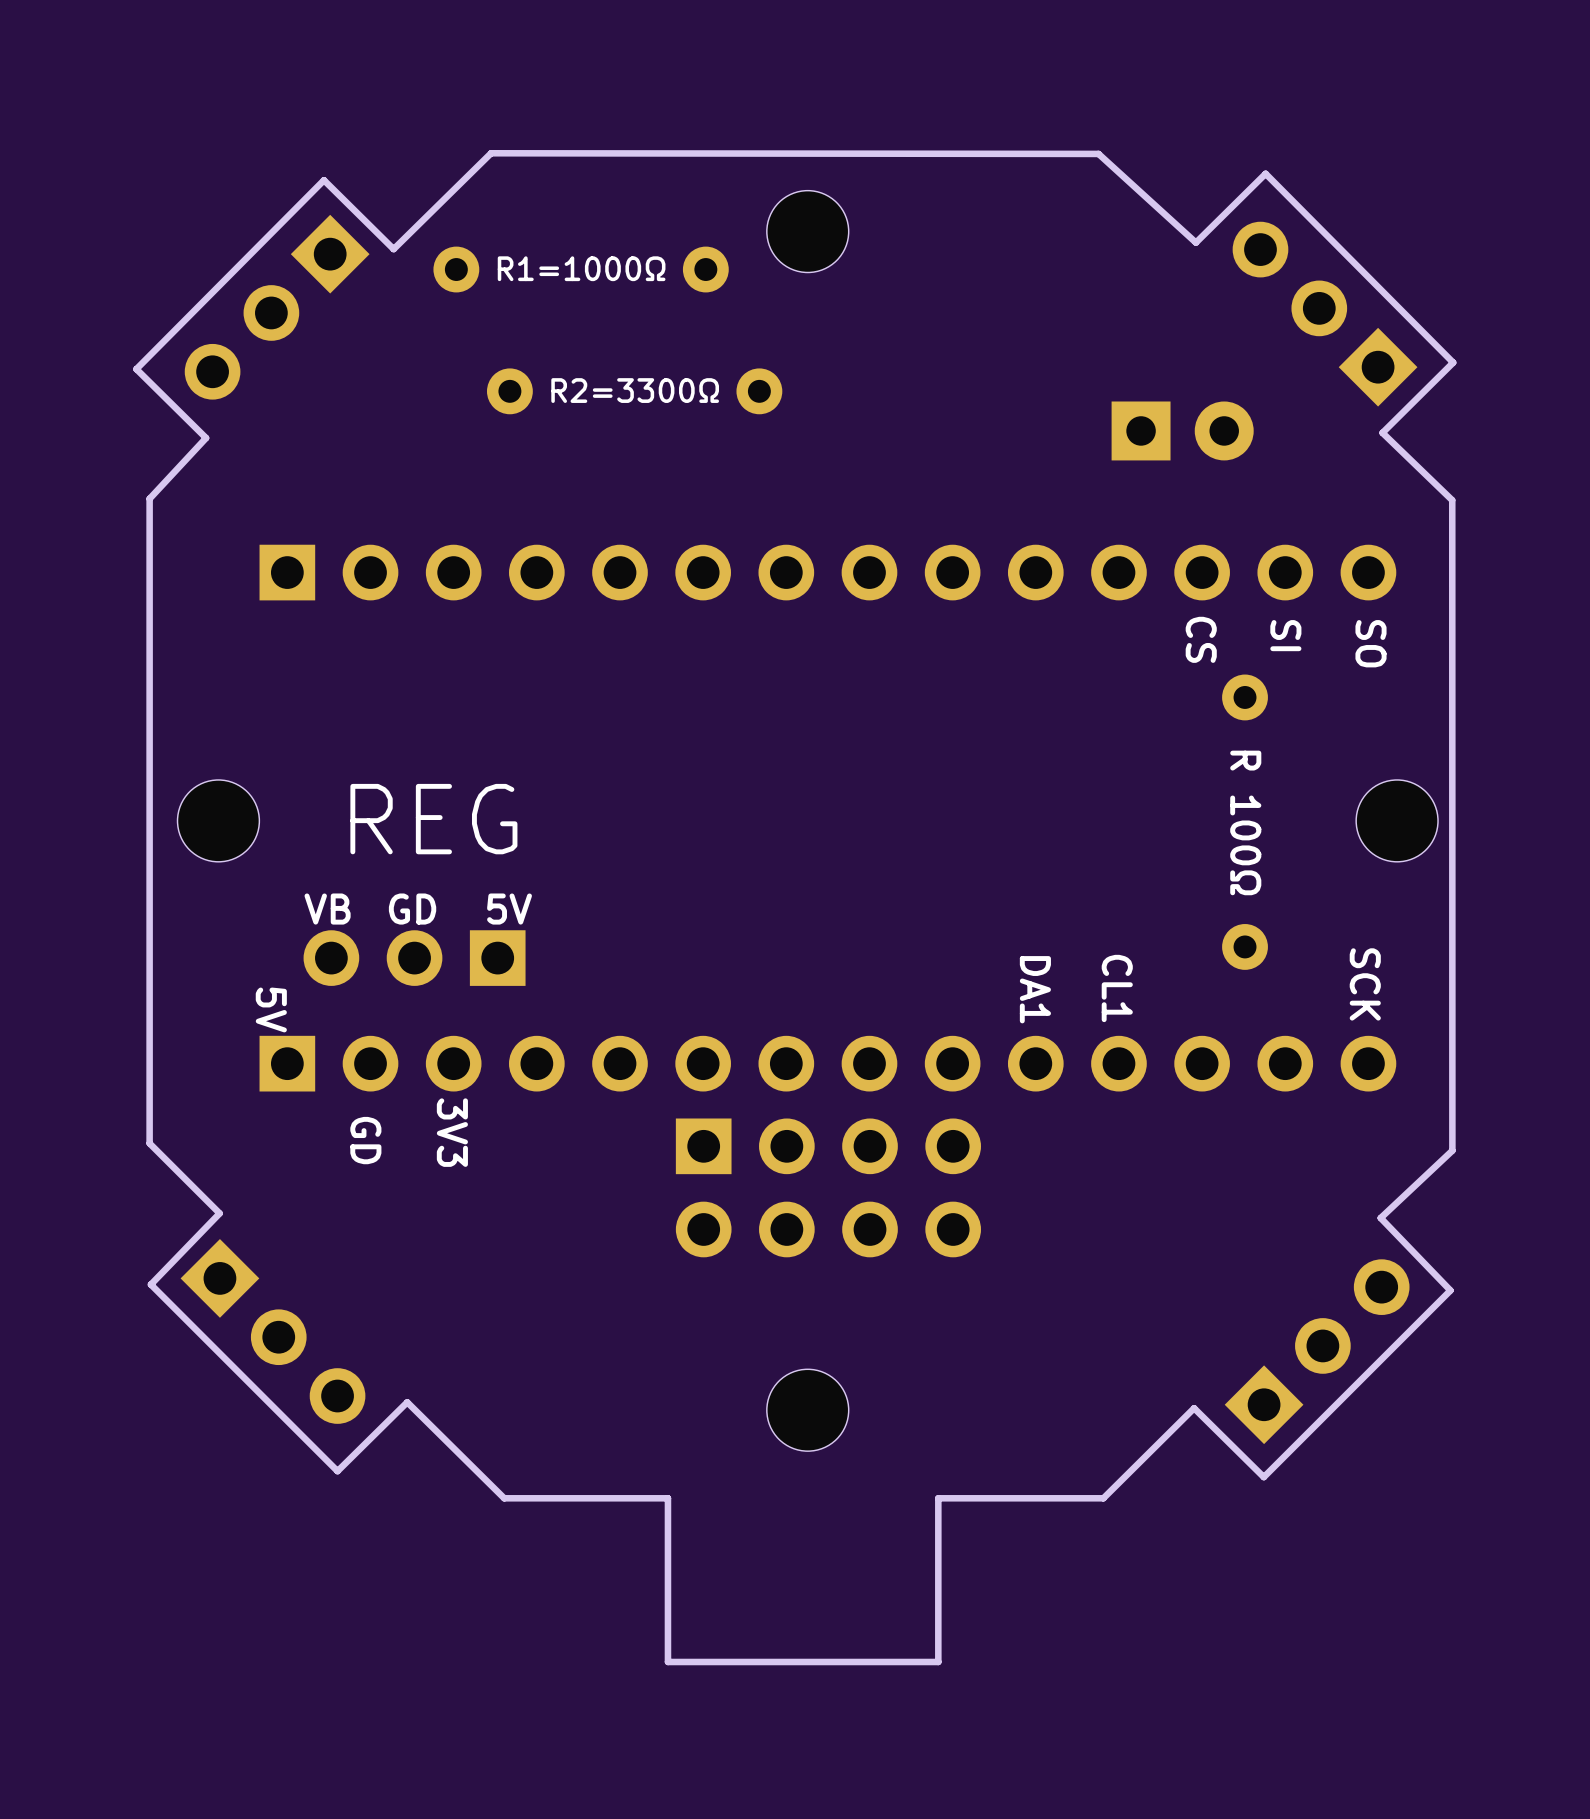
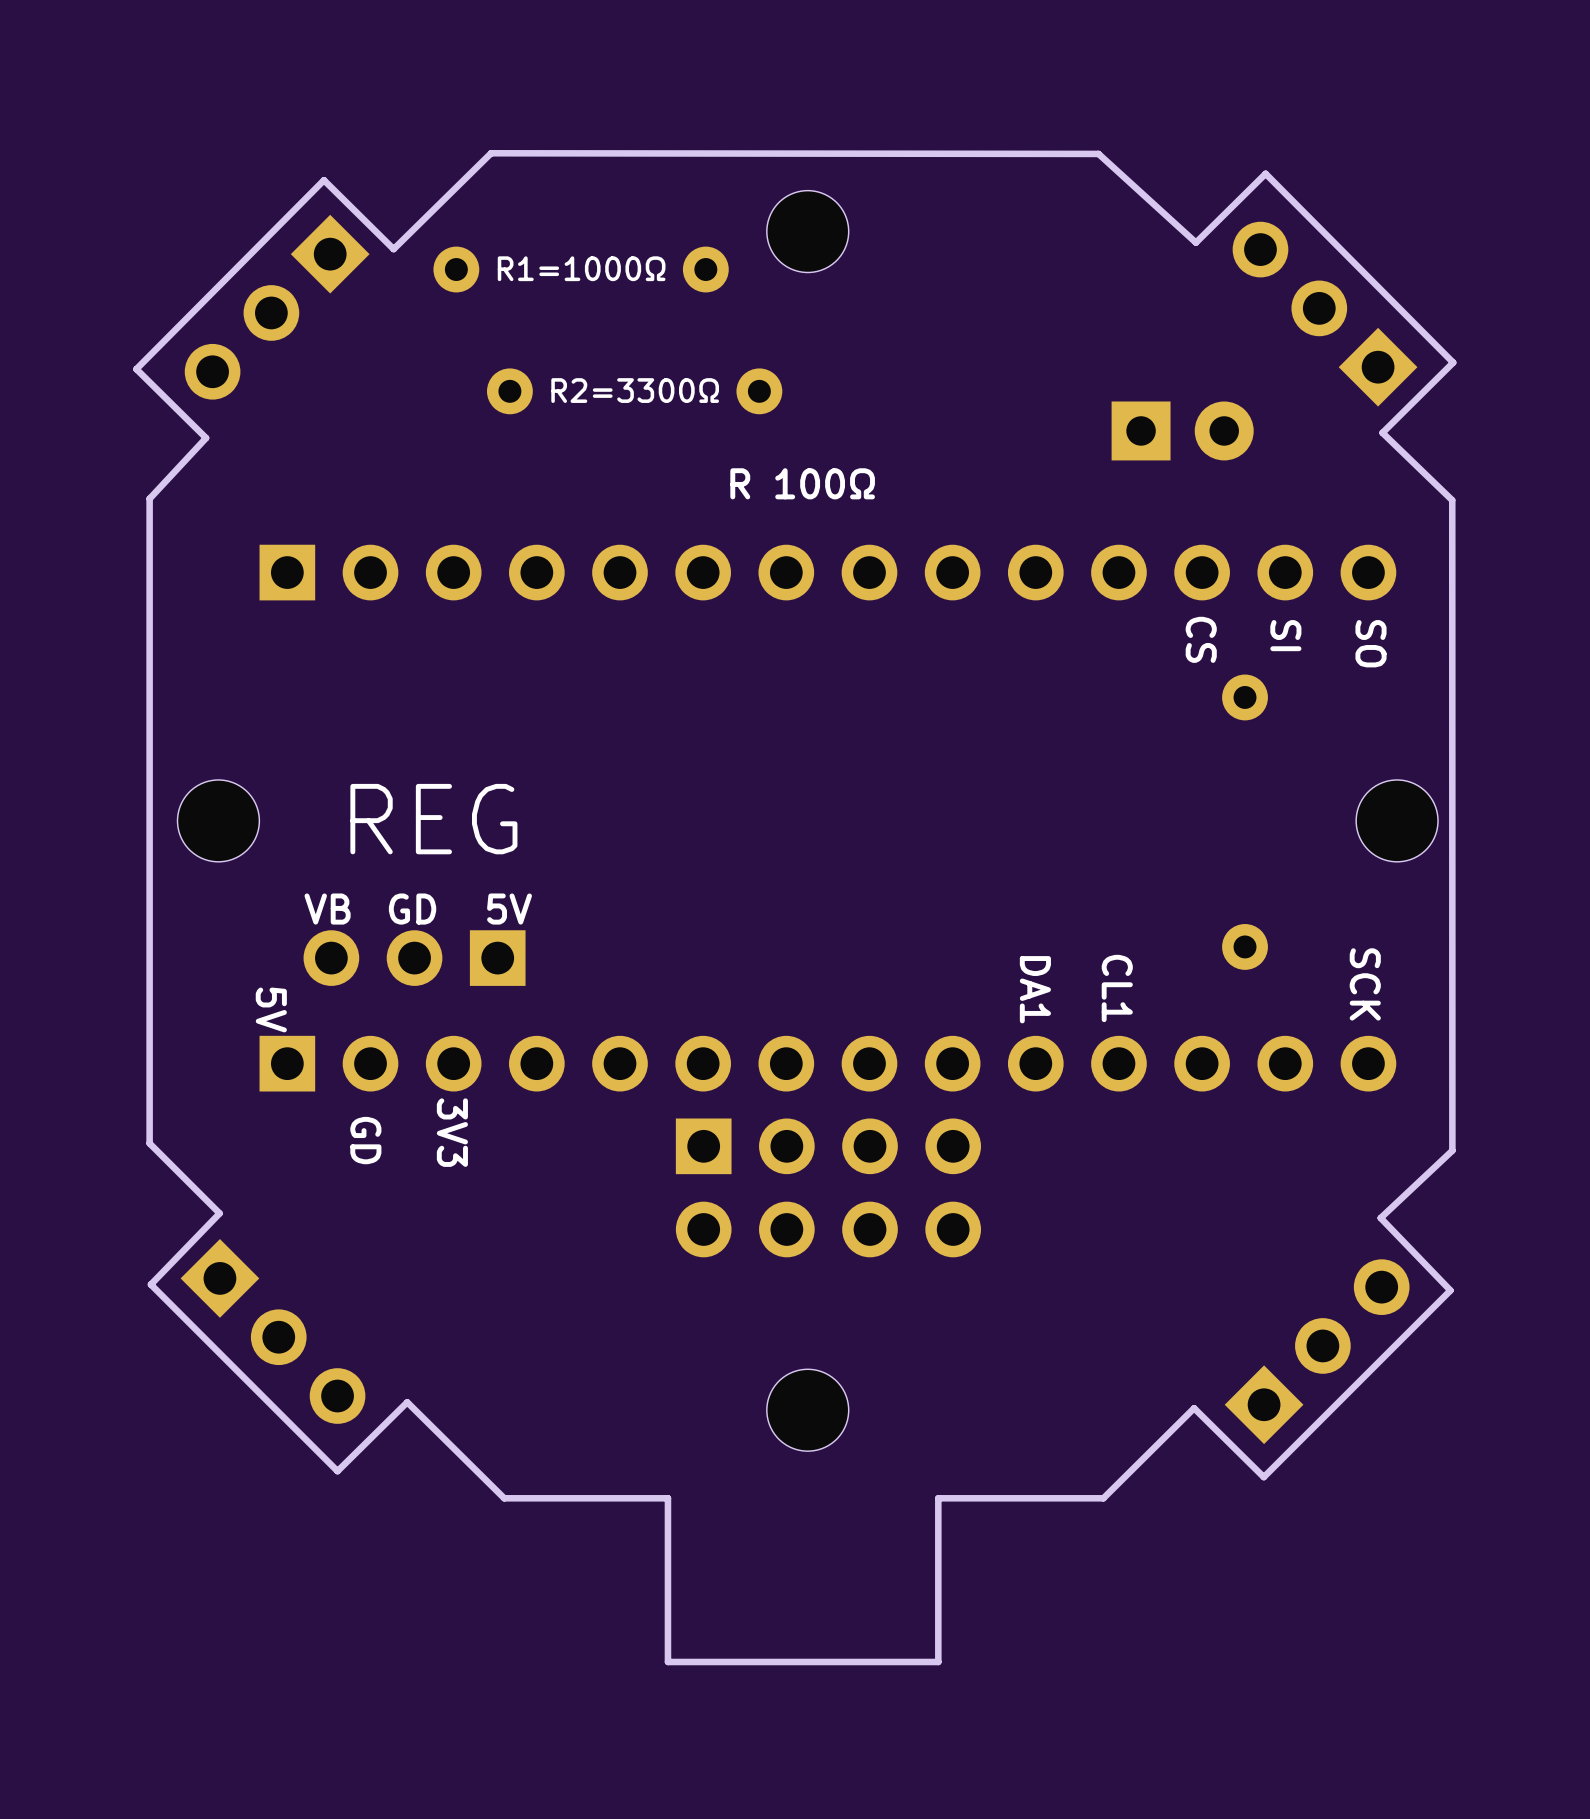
text rotation: 0° (1245, 822) -> 90° counterclockwise (802, 483)
text position: R 100Ω (1245, 822) -> R 100Ω (802, 483)

